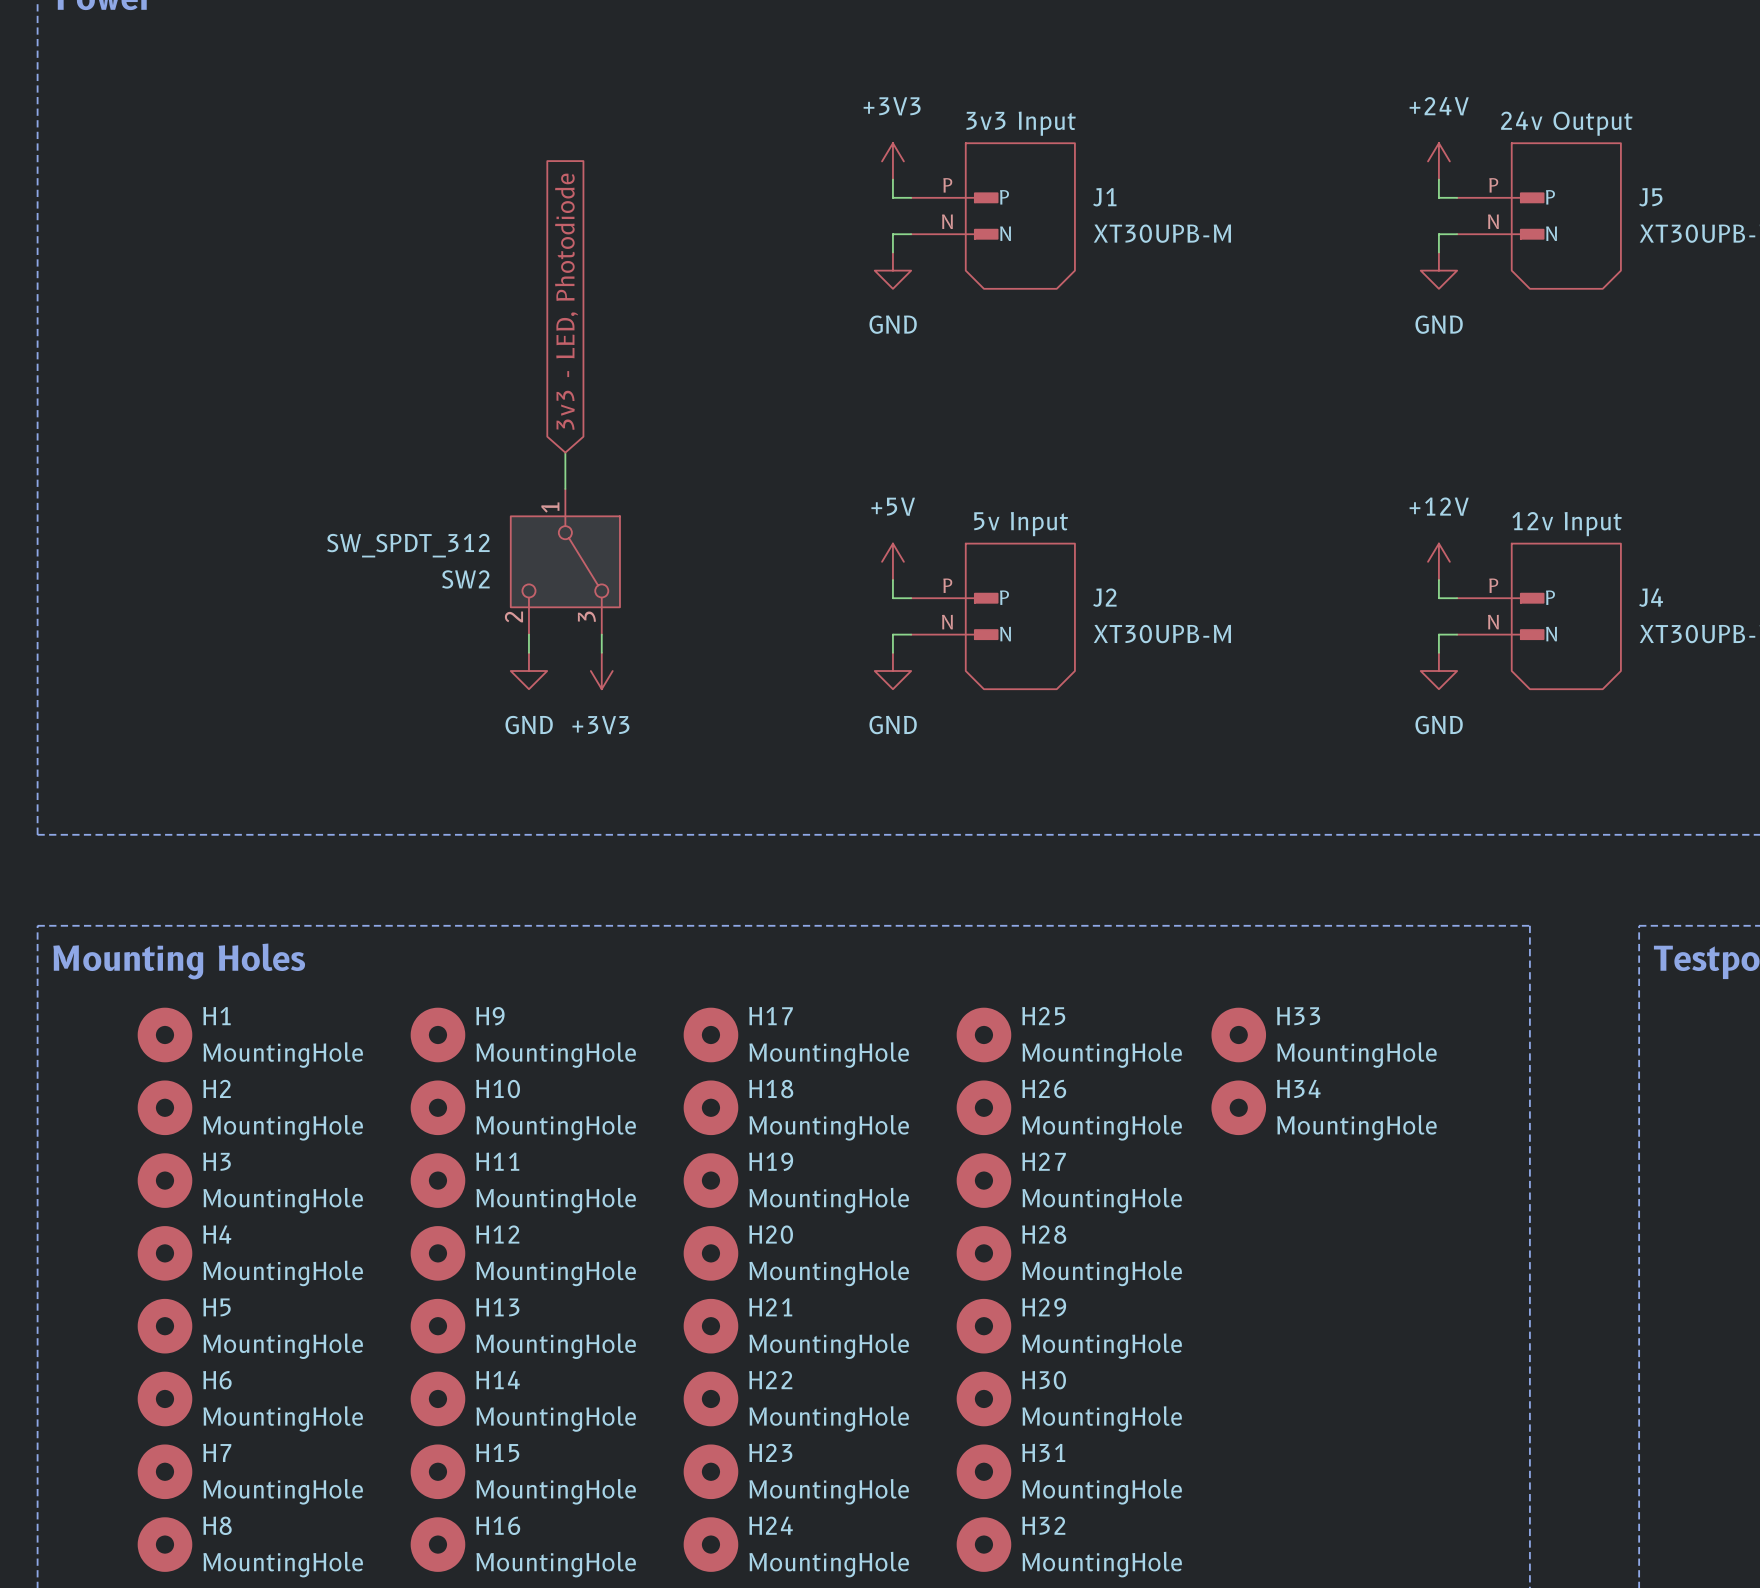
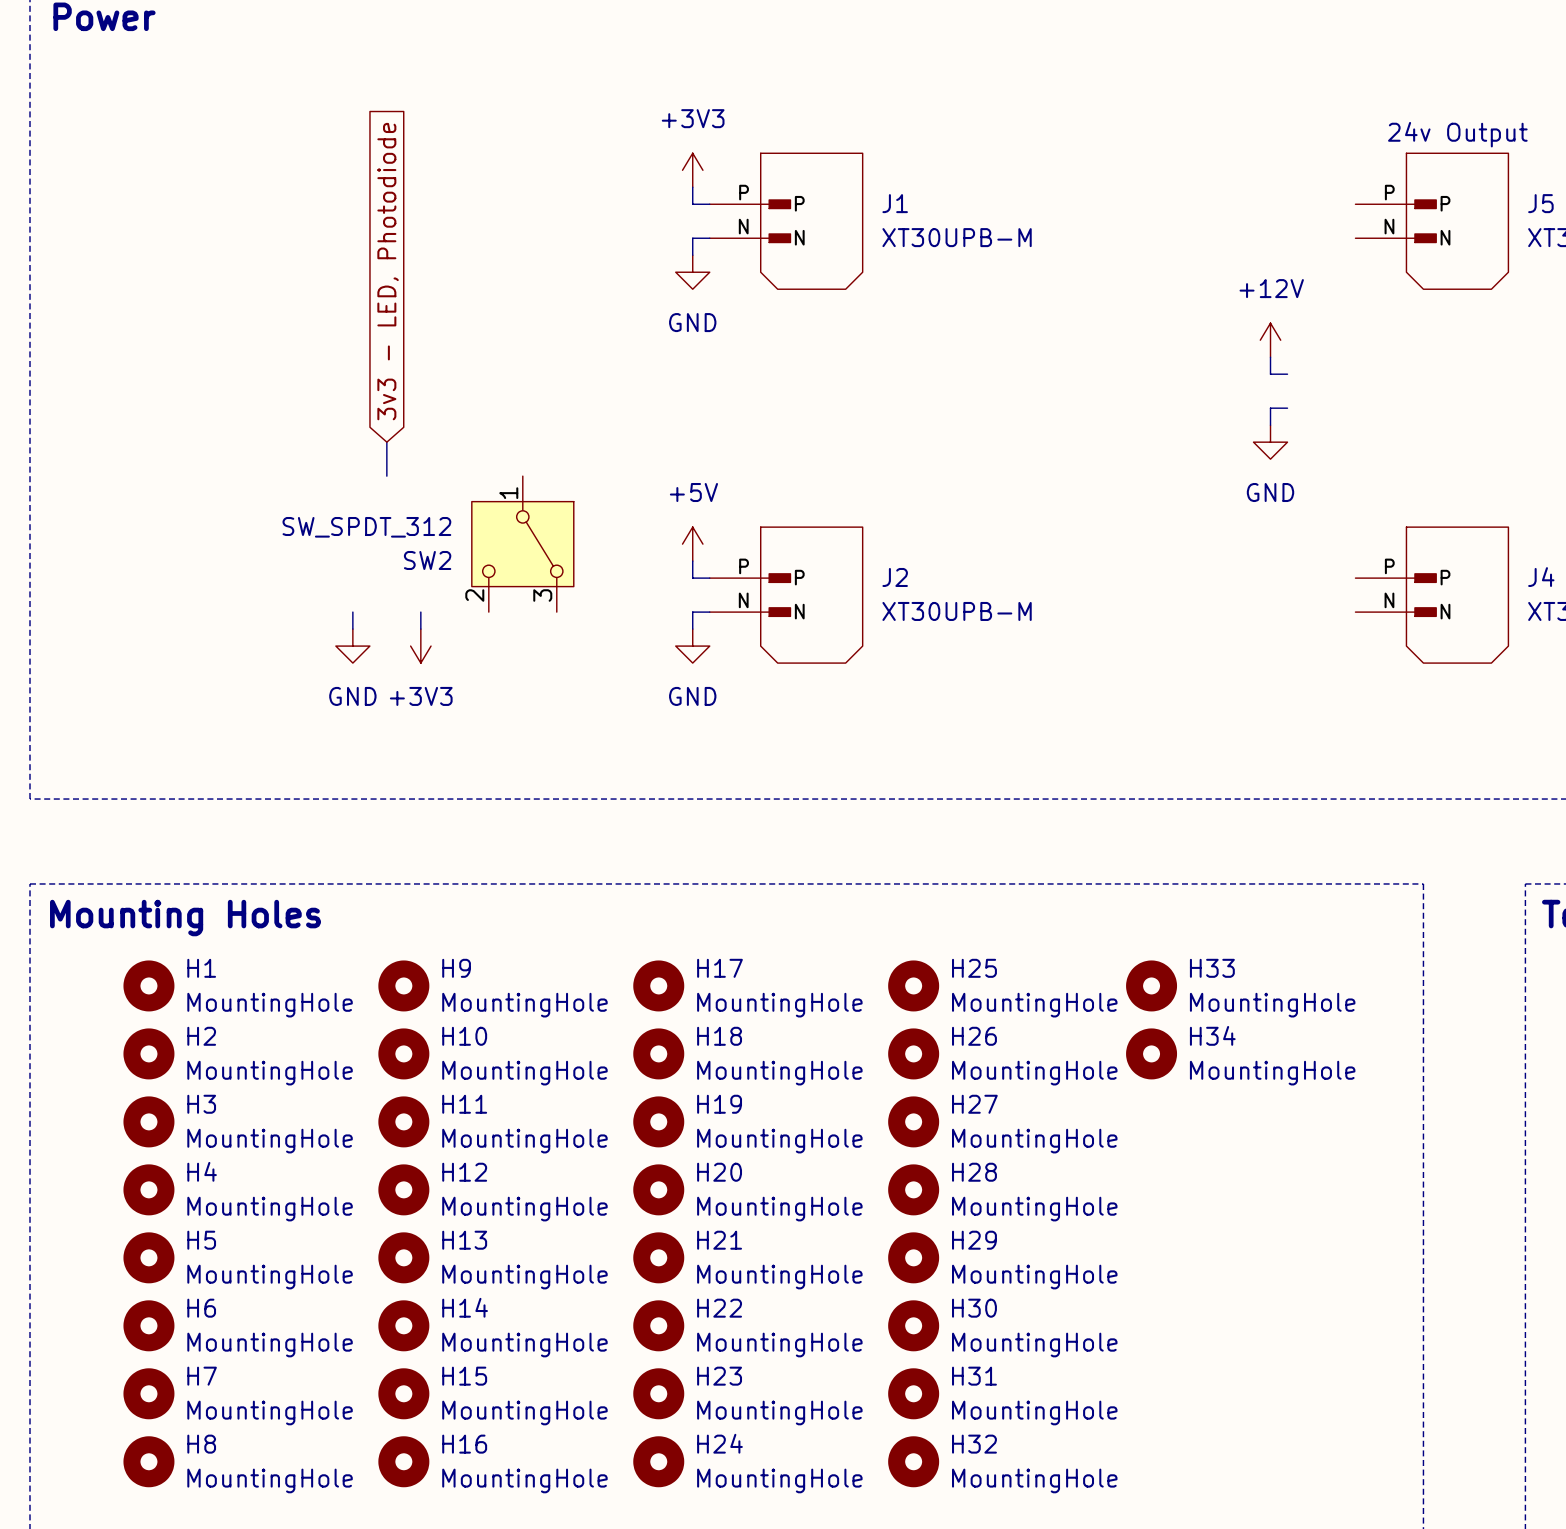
J1 text: 3v3 Input (1021, 123) -> none
power symbol position: +3V3 (892, 161) -> +3V3 (692, 170)
power symbol: +24V (1438, 161) -> none
wire: (892, 179) (892, 197) (911, 197) -> (692, 187) (692, 204) (709, 204)
wire: (1438, 179) (1438, 197) (1457, 197) -> (1270, 357) (1270, 374) (1287, 374)
J1 position: (993, 216) -> (786, 221)
wire: (911, 234) (892, 234) (892, 252) -> (709, 238) (692, 238) (692, 255)
wire: (1457, 234) (1438, 234) (1438, 252) -> (1287, 408) (1270, 408) (1270, 425)
power symbol position: GND (892, 270) -> GND (692, 272)
power symbol: GND (1438, 270) -> none
global label position: 3v3 - LED, Photodiode (566, 301) -> 3v3 - LED, Photodiode (388, 271)
wire: (565, 452) (565, 489) -> (386, 442) (386, 476)
power symbol: none -> GND (1270, 442)
J2 text: 5v Input (1021, 524) -> none
J4 text: 12v Input (1567, 524) -> none
power symbol position: +5V (892, 561) -> +5V (692, 544)
power symbol position: +12V (1438, 561) -> +12V (1270, 340)
wire: (892, 580) (892, 598) (911, 598) -> (692, 561) (692, 578) (709, 578)
wire: (1438, 580) (1438, 598) (1457, 598) -> none
J2 position: (993, 616) -> (786, 595)
wire: (528, 634) (528, 652) -> (352, 612) (352, 629)
wire: (601, 634) (601, 652) -> (420, 612) (420, 629)
wire: (911, 634) (892, 634) (892, 652) -> (709, 612) (692, 612) (692, 629)
wire: (1457, 634) (1438, 634) (1438, 652) -> none
power symbol: none -> GND (352, 646)
power symbol: GND (528, 671) -> none
power symbol position: +3V3 (601, 671) -> +3V3 (420, 646)
power symbol: none -> GND (692, 646)
power symbol: GND (892, 671) -> none
power symbol: GND (1438, 671) -> none

